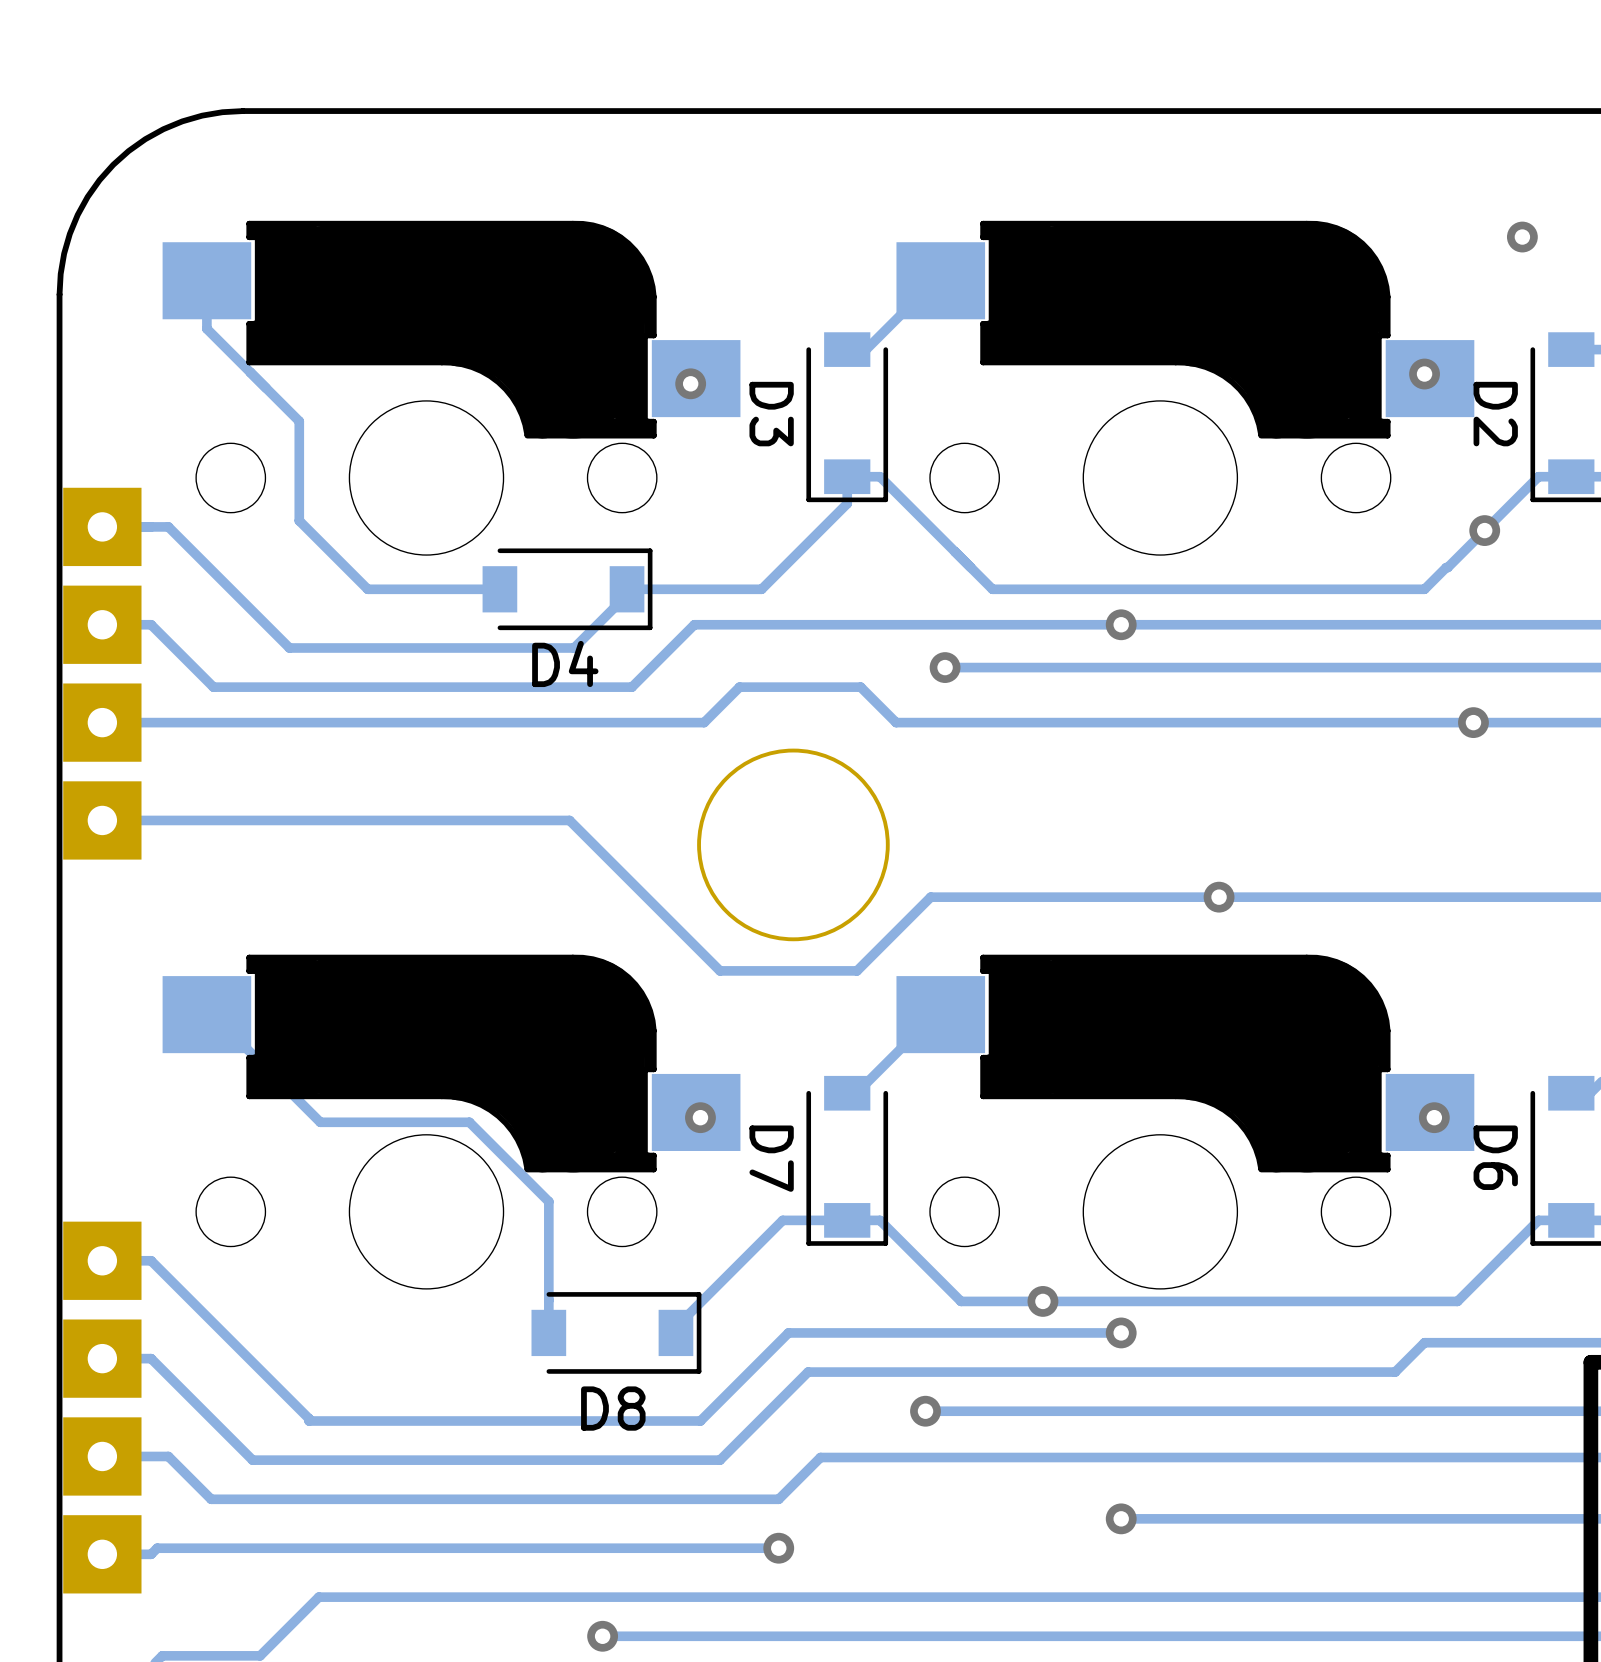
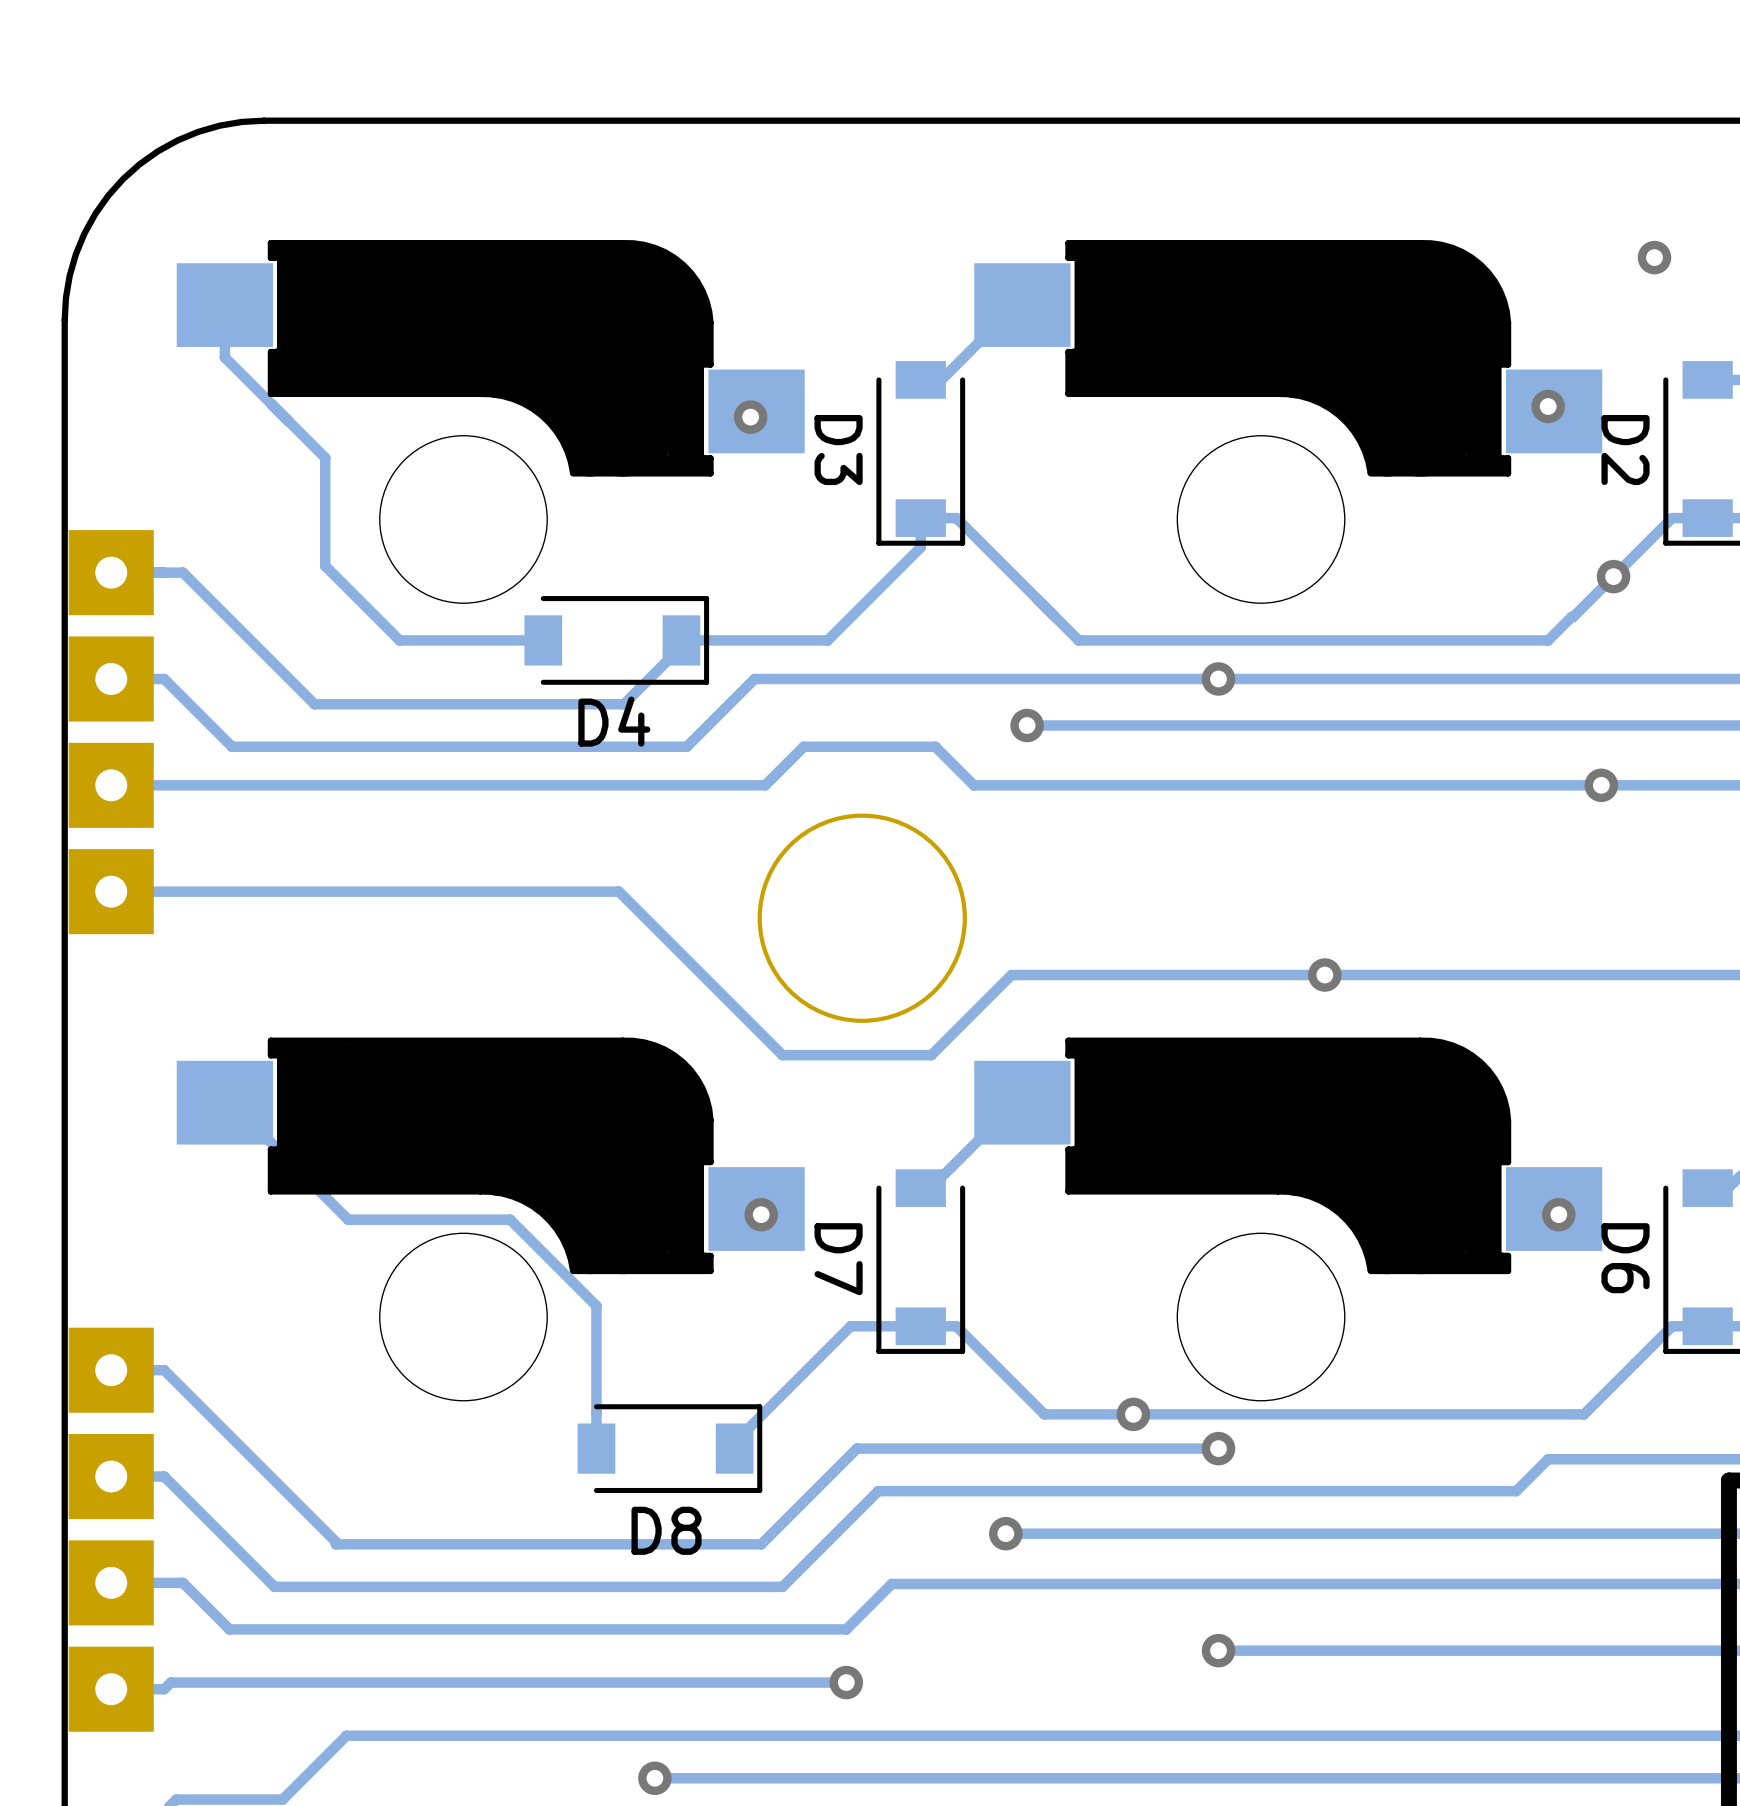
part footprint: [162, 220, 741, 556] -> [176, 240, 805, 604]
part footprint: [896, 220, 1475, 556] -> [974, 240, 1603, 604]
part footprint: [162, 954, 741, 1289] -> [176, 1037, 805, 1401]
part footprint: [896, 954, 1475, 1289] -> [974, 1037, 1603, 1401]

